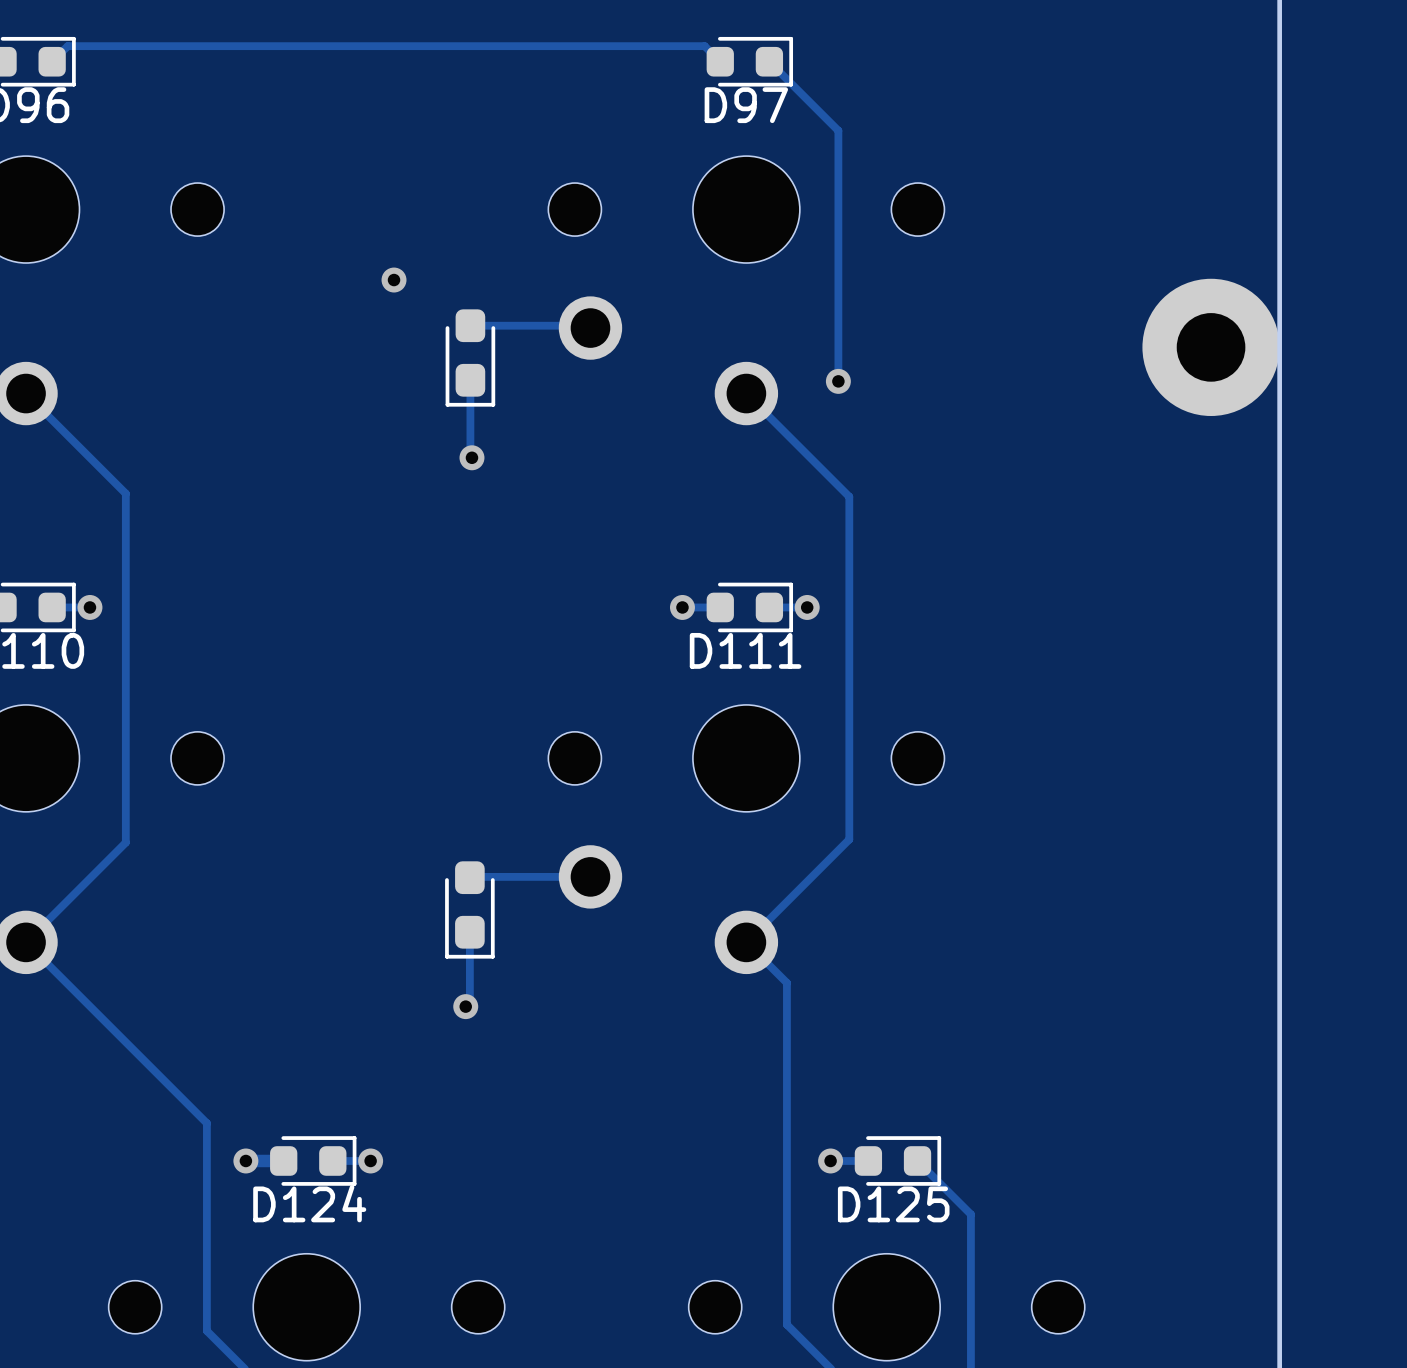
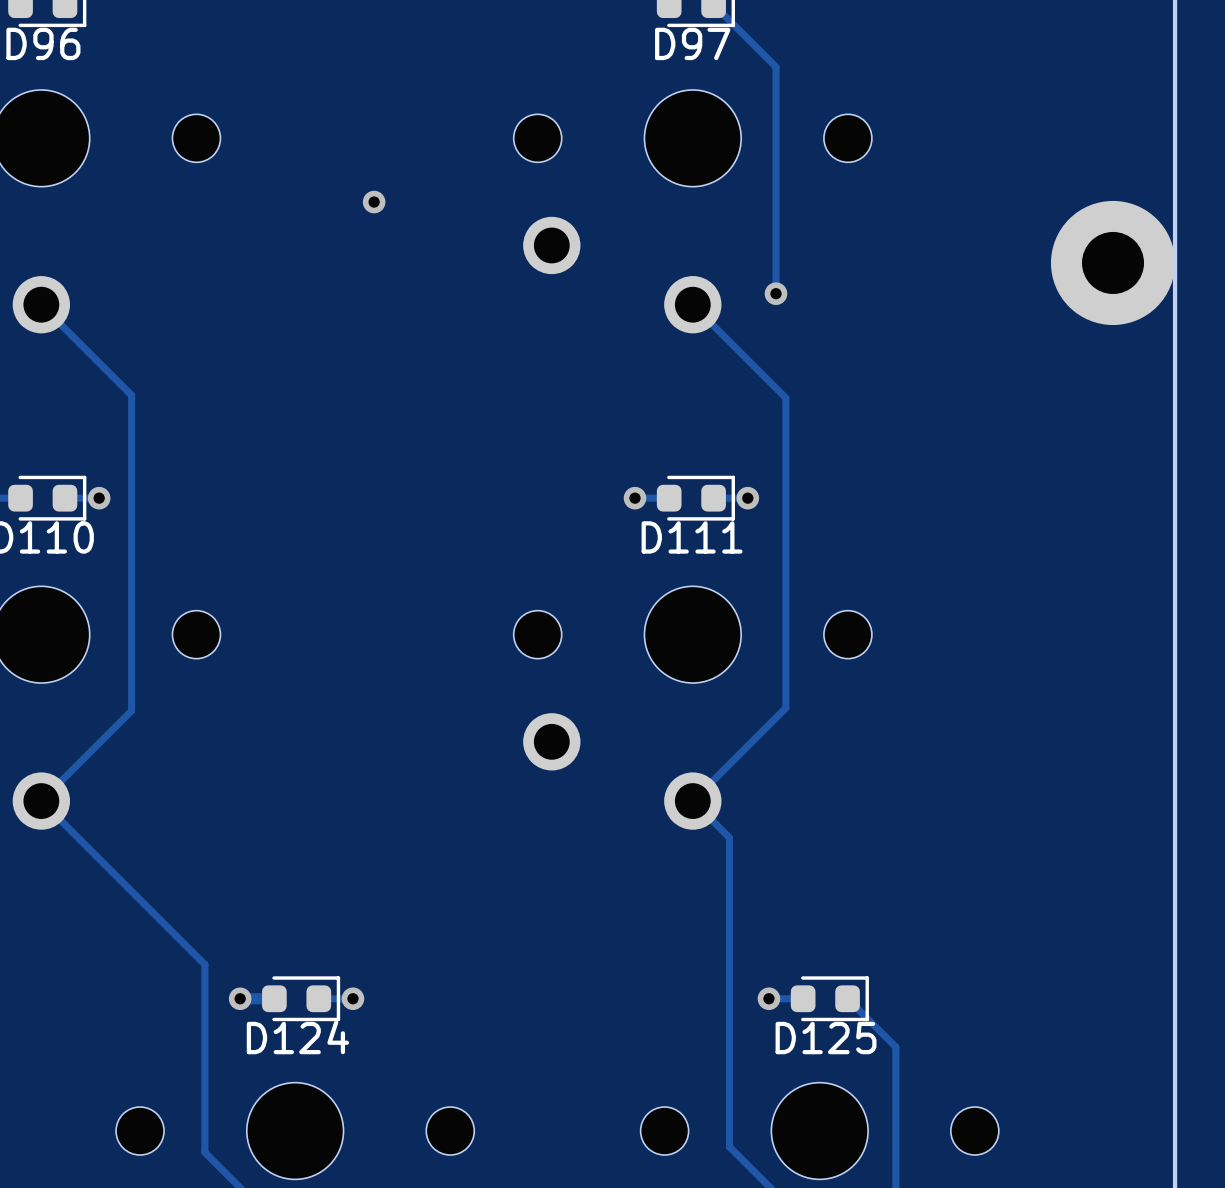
track: (470, 325) (588, 325) (590, 328) -> none
part: (470, 357) -> none
track: (470, 380) (470, 456) (471, 457) -> none
via: (471, 457) -> none
track: (590, 876) (469, 877) -> none
part: (469, 909) -> none
track: (469, 932) (469, 1002) (465, 1006) -> none
via: (465, 1006) -> none

